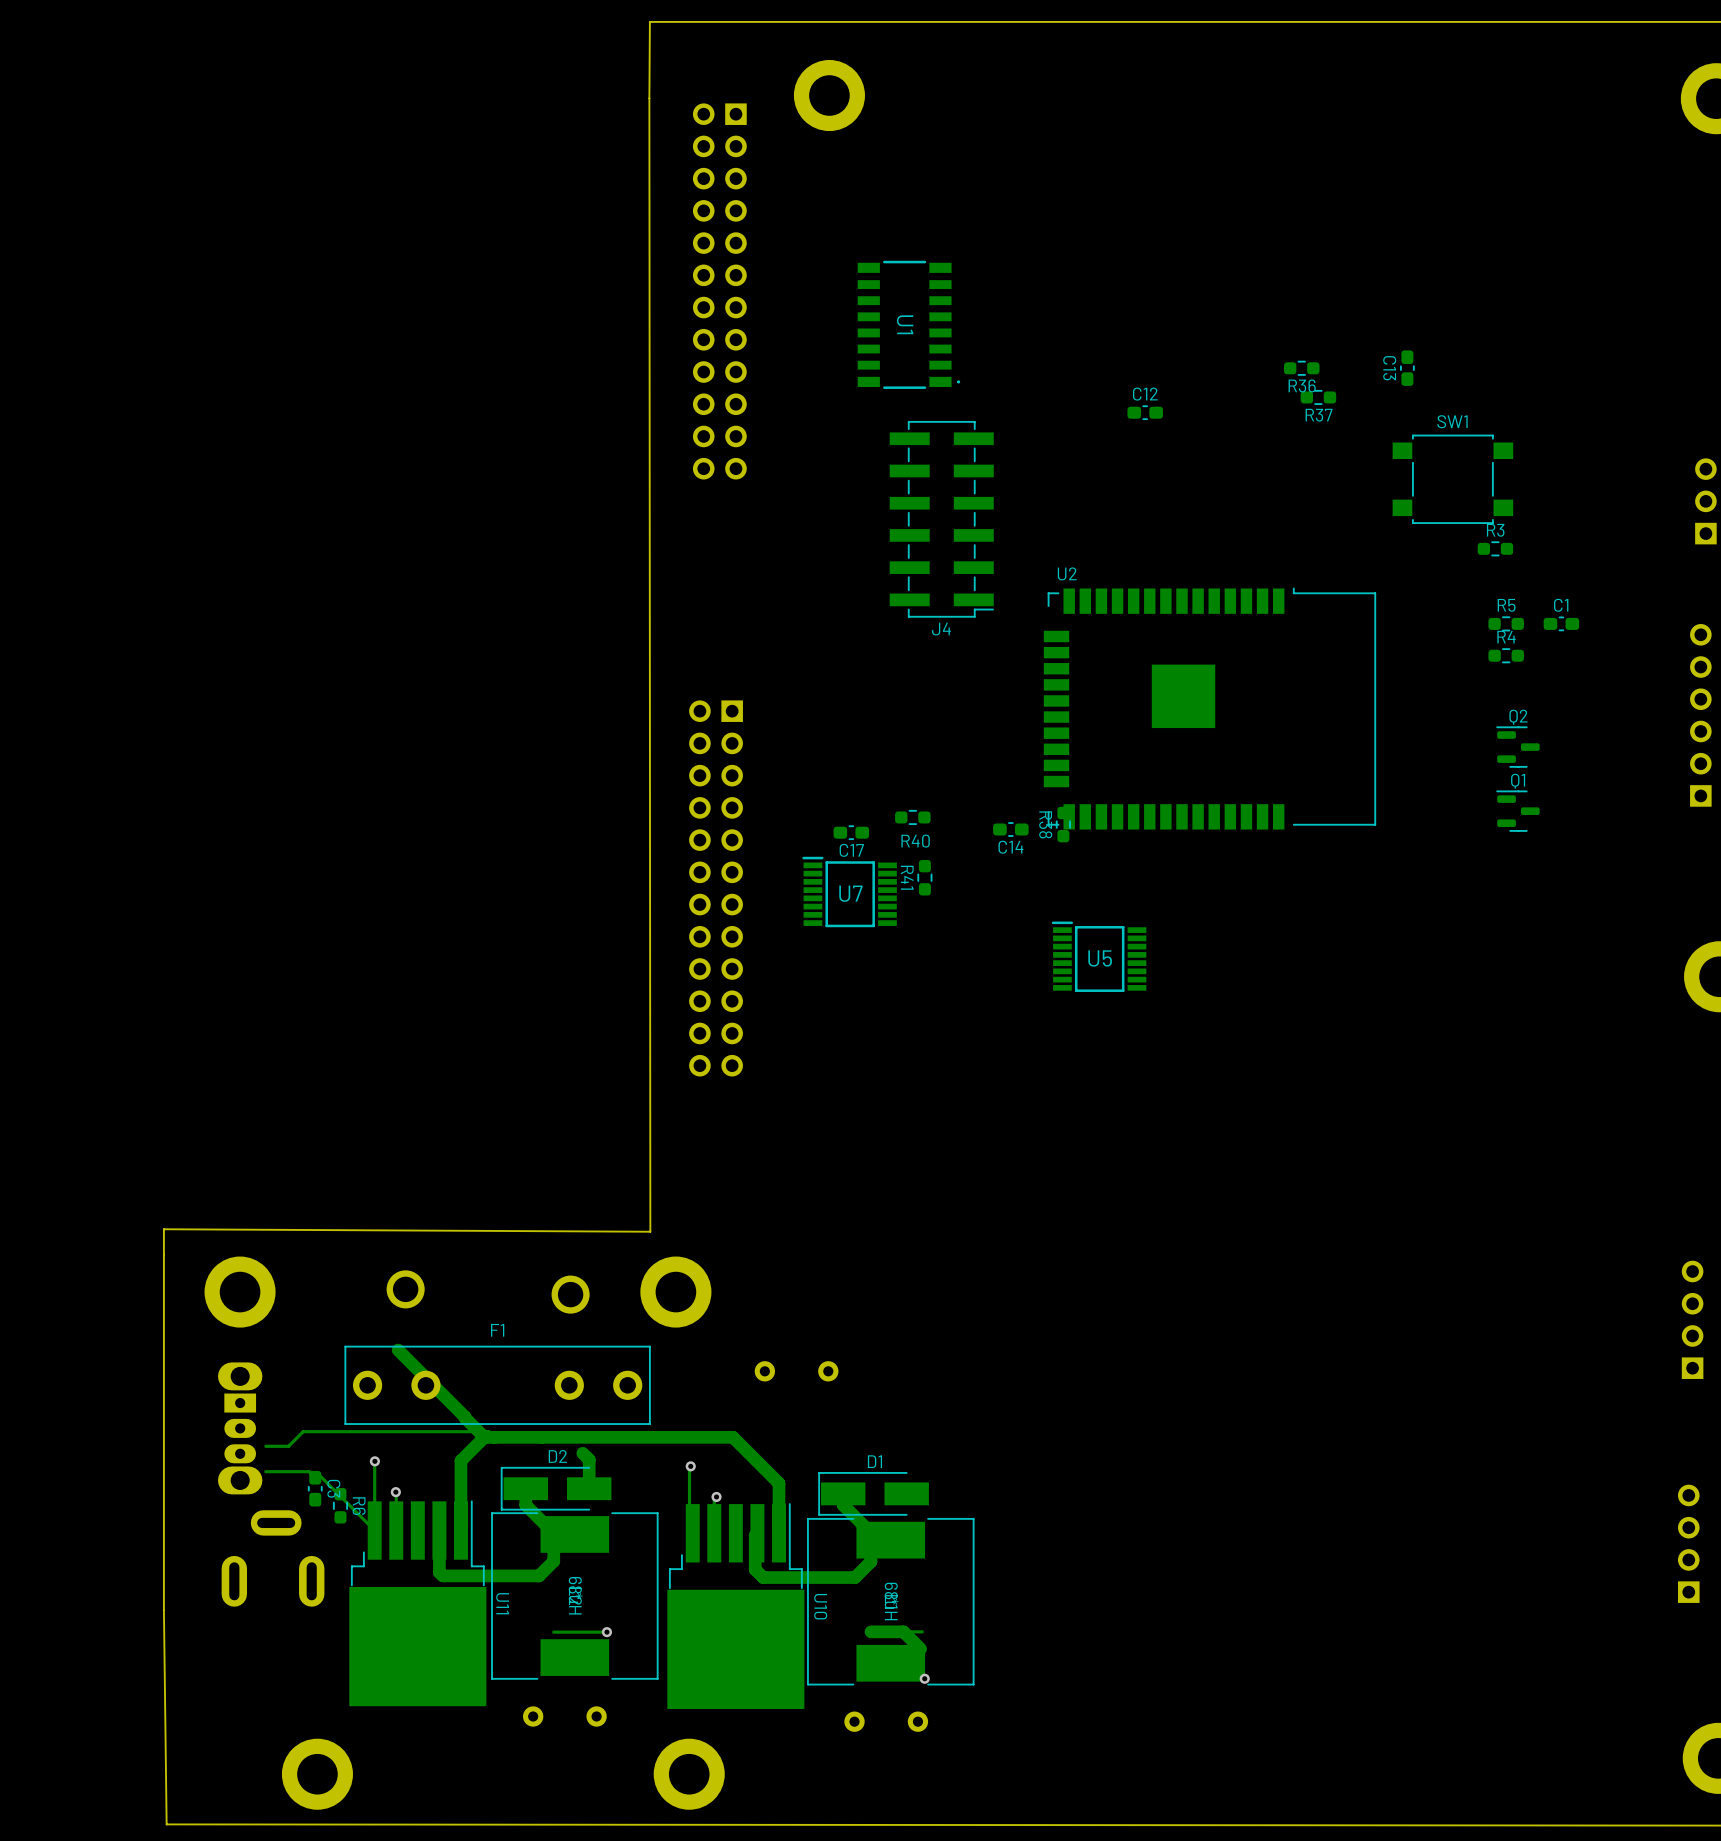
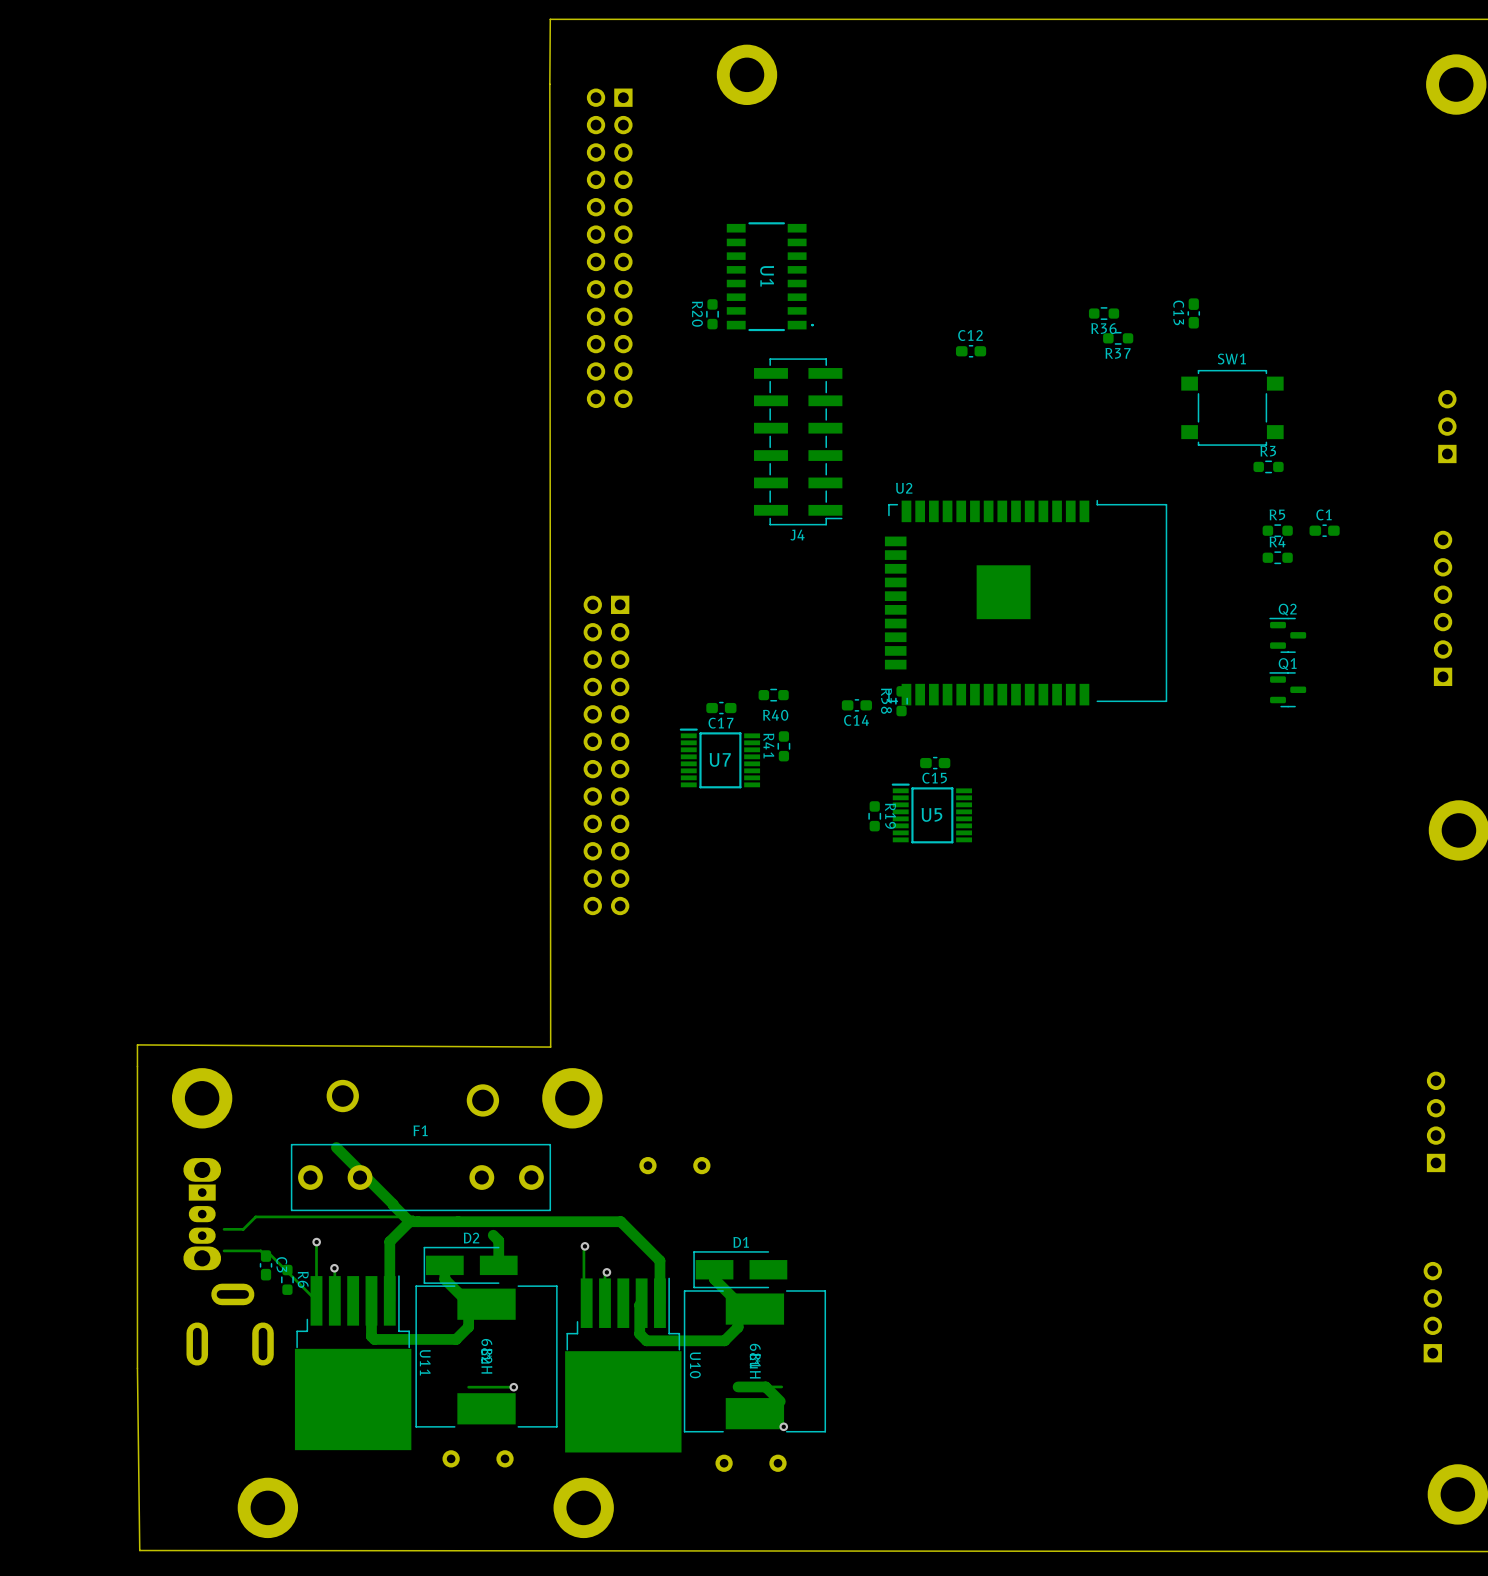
part position: (829, 95) -> (747, 74)
R20: none -> (712, 314)
C15: none -> (935, 763)
R19: none -> (874, 816)

